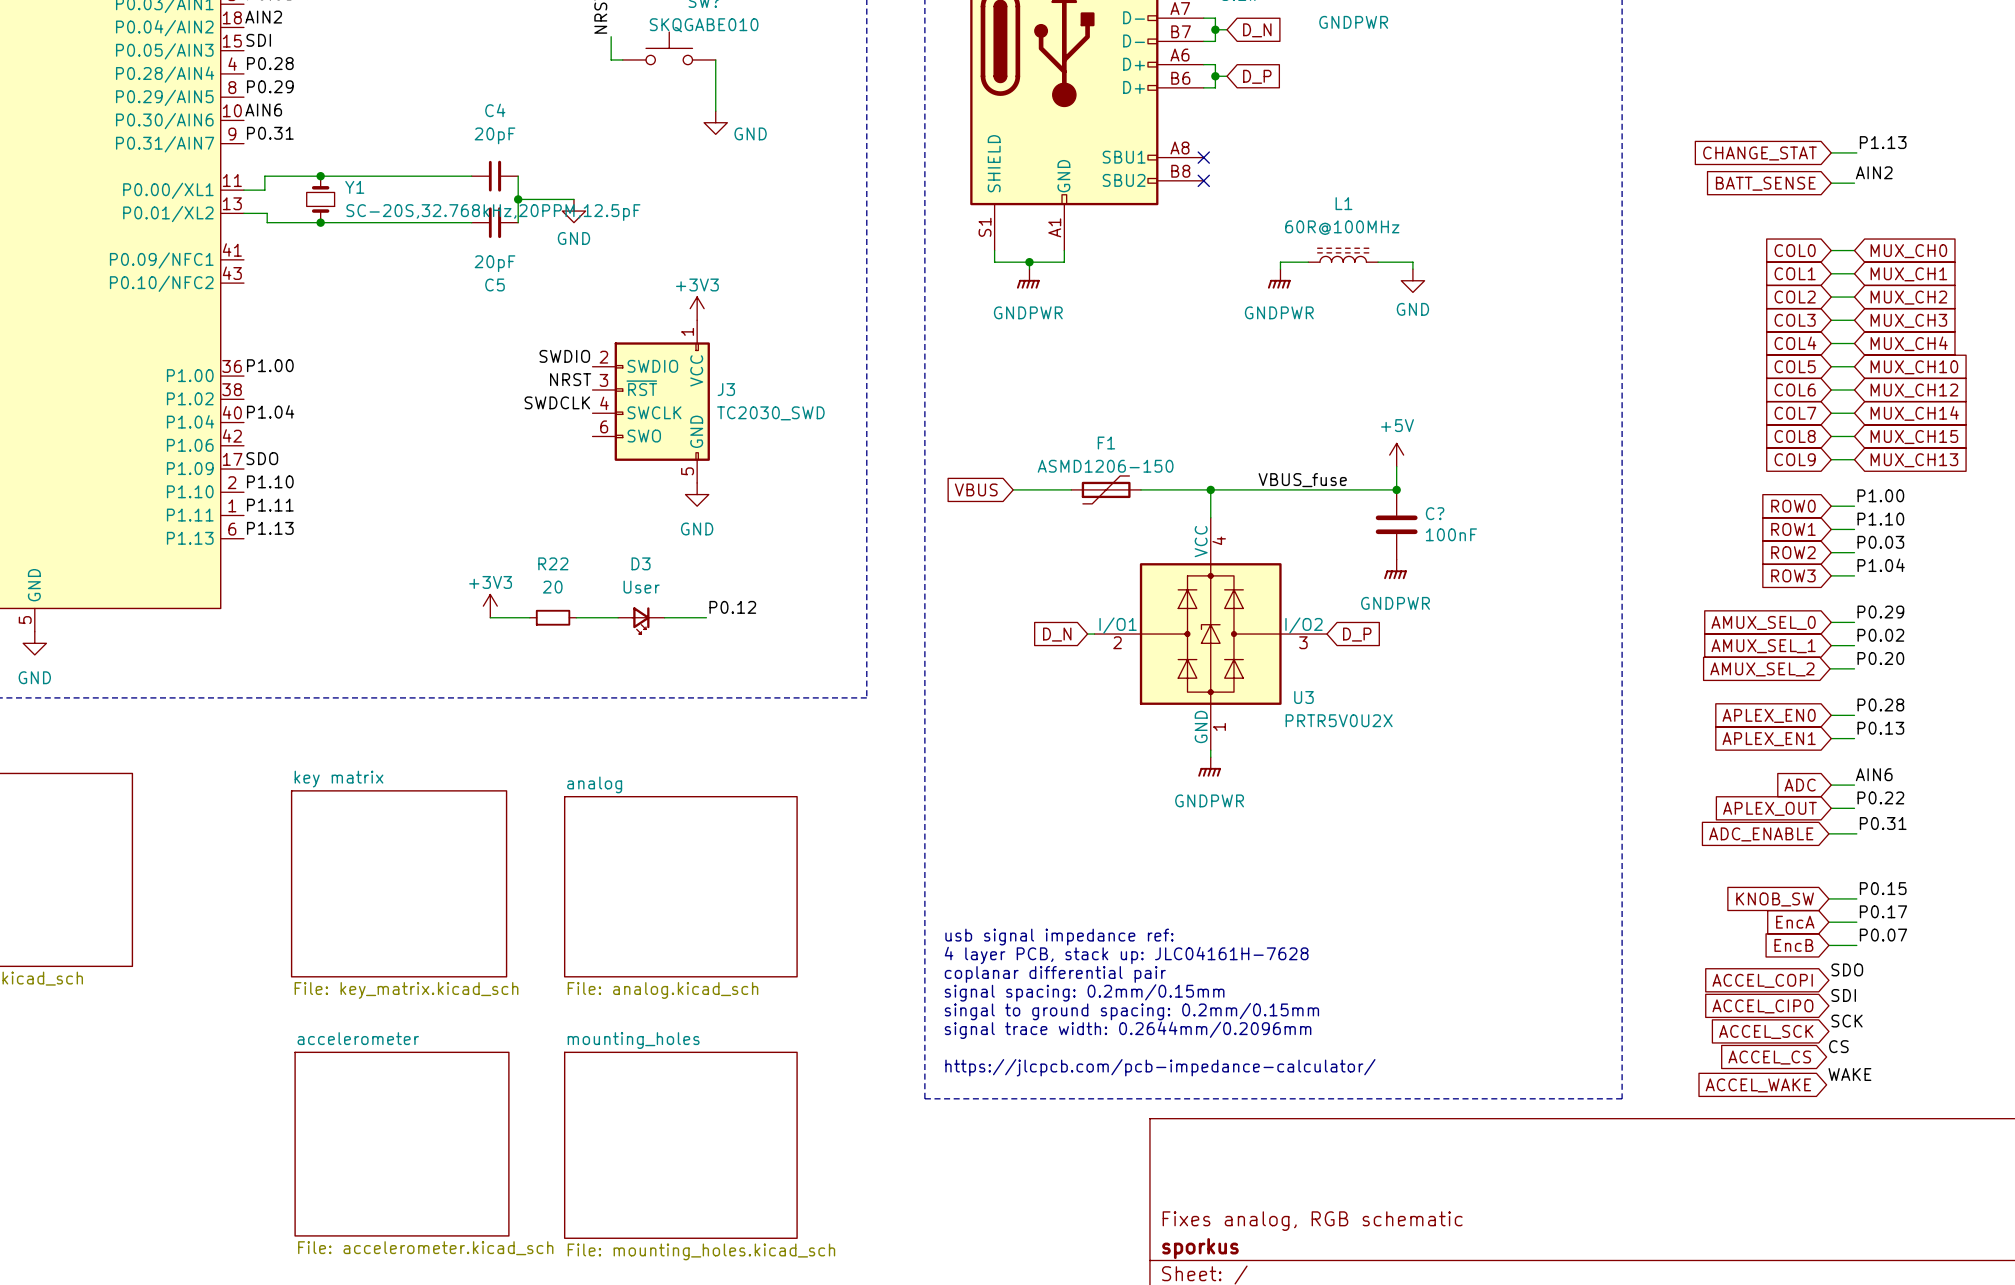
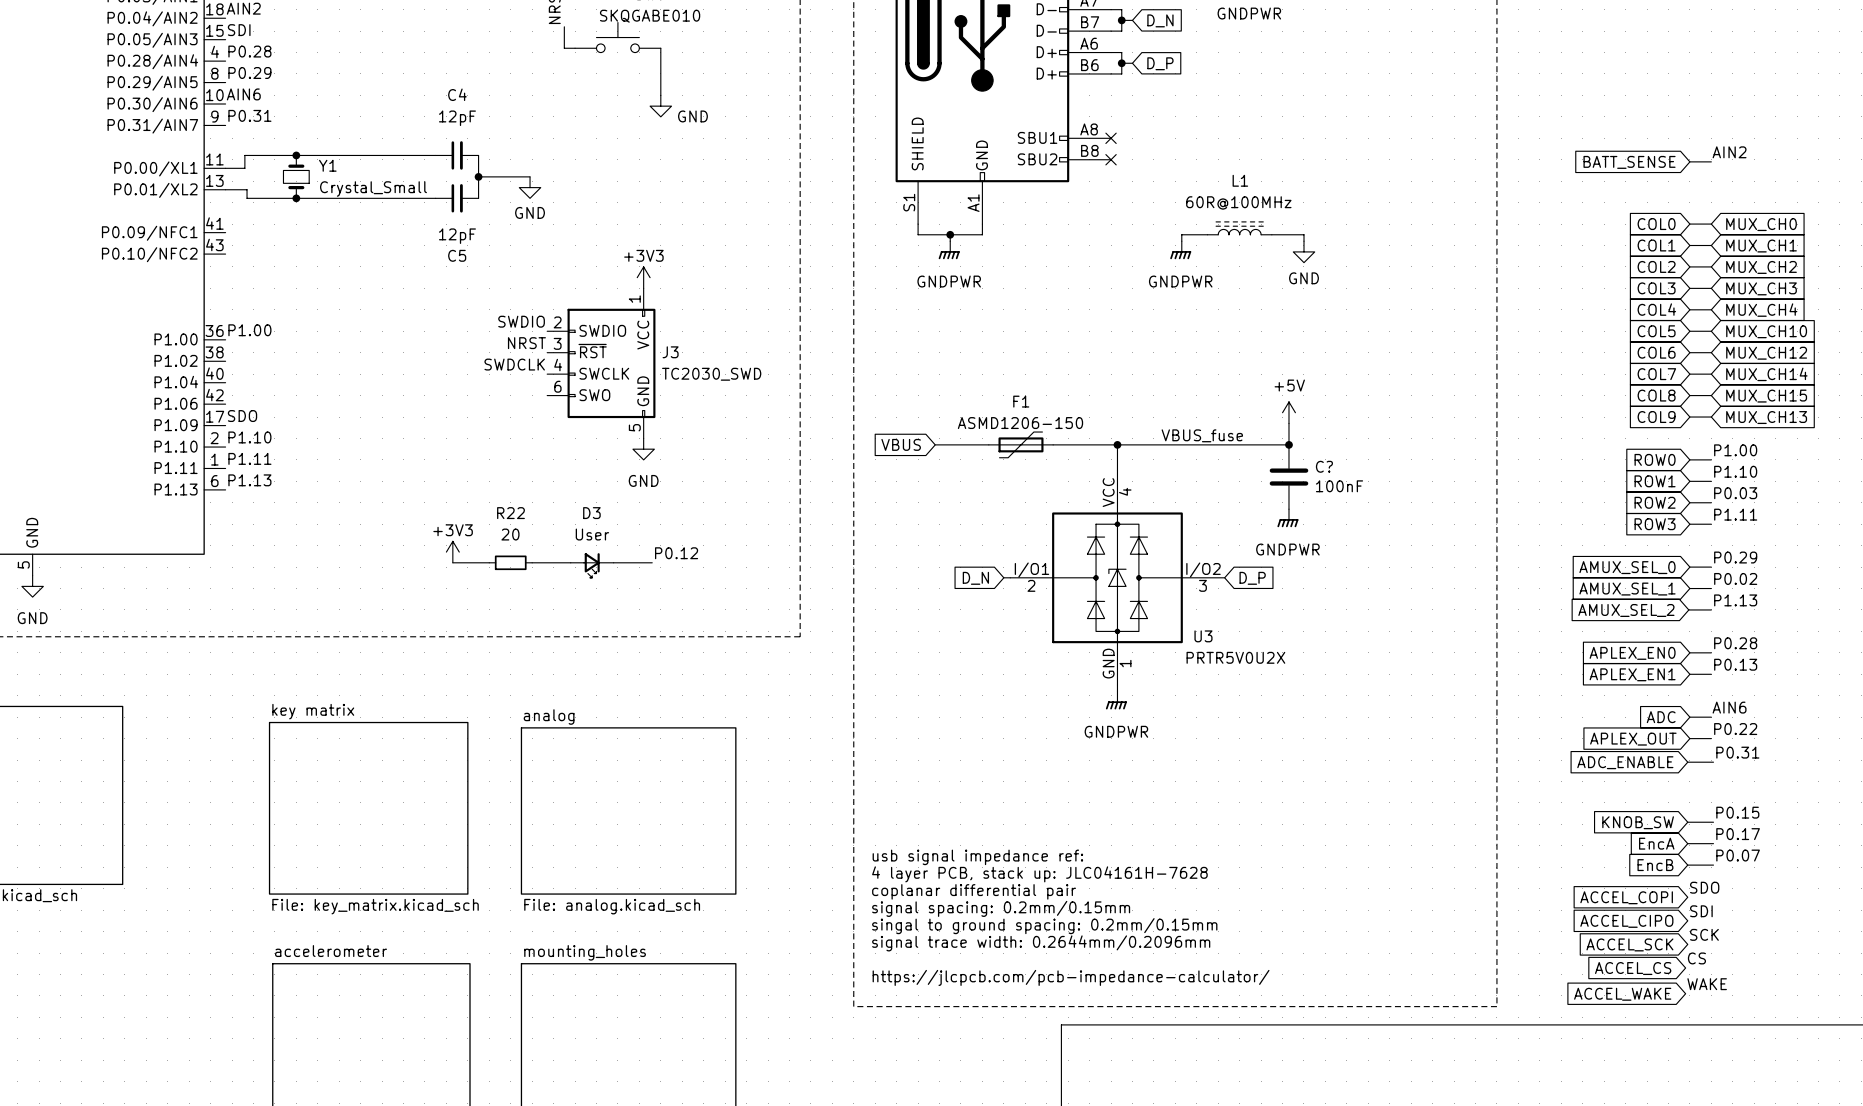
C4 value: 20pF (495, 135) -> 12pF (457, 118)
label: P1.13 (1883, 142) -> none
wire: (1831, 152) (1856, 152) -> none
global label: CHANGE_STAT (1759, 153) -> none
Y1 value: SC-20S,32.768kHz,20PPM,12.5pF (493, 212) -> Crystal_Small (373, 189)
C5 value: 20pF (495, 263) -> 12pF (457, 236)
label: P1.04 (270, 411) -> none
label: P1.04 (1881, 565) -> P1.11 (1735, 514)
label: P0.20 (1880, 658) -> P1.13 (1735, 600)

